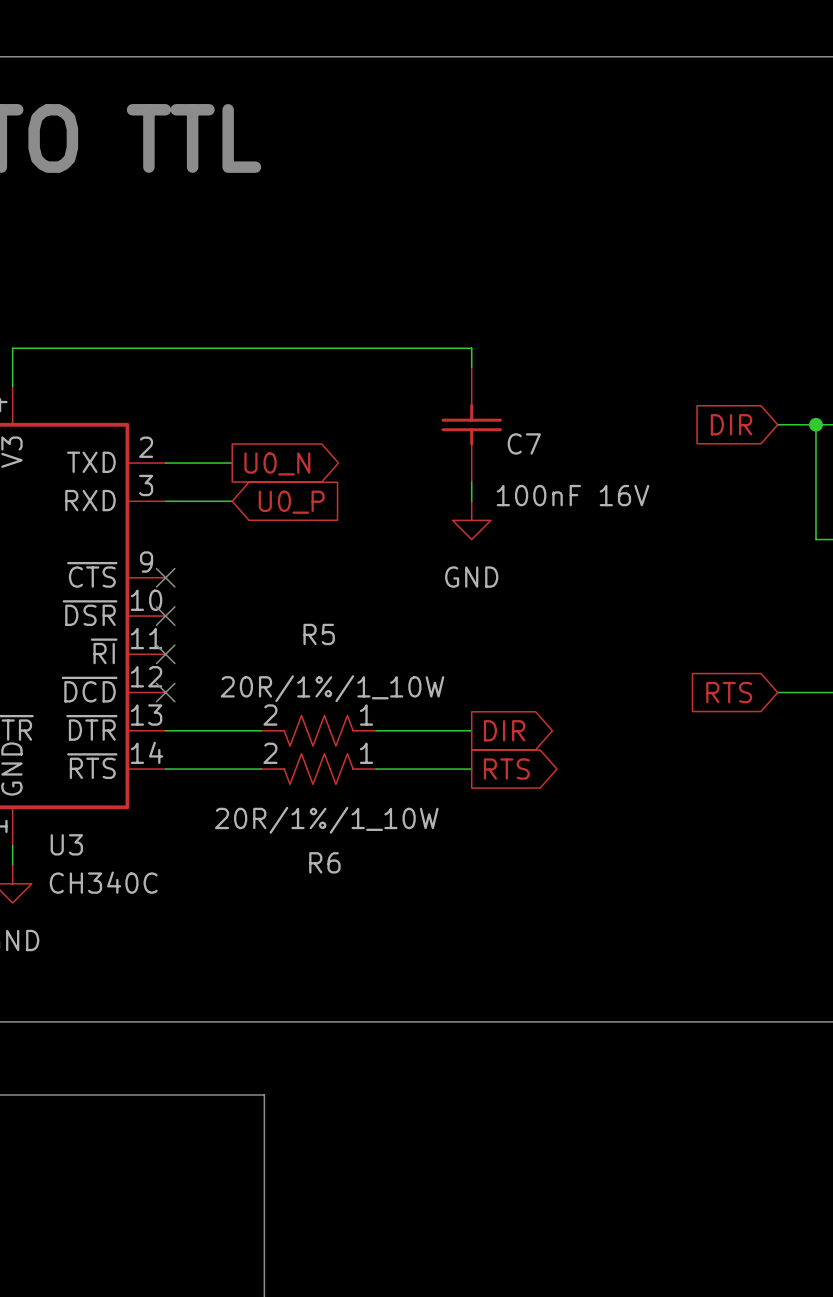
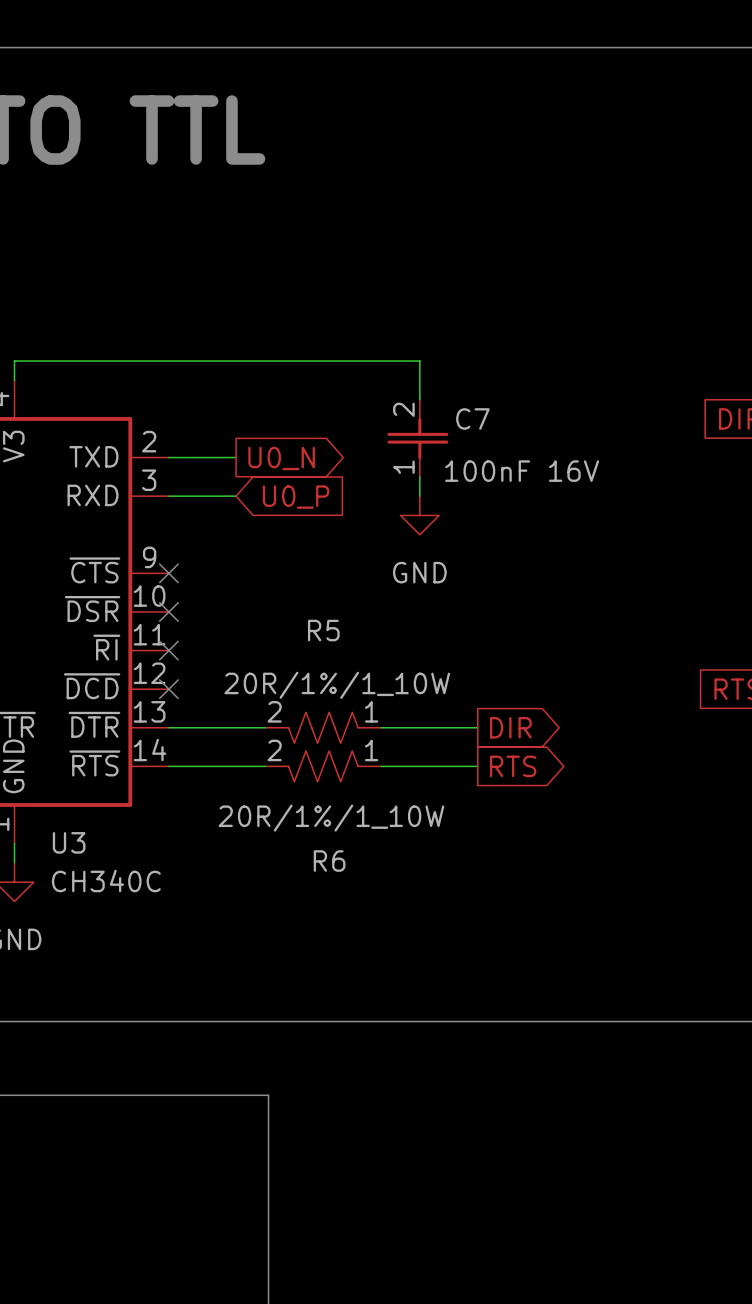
wire: (12, 367) (12, 348) (471, 348) (471, 367) -> (14, 361) (419, 361) (419, 399)
C7 symbol: [441, 367, 502, 483] -> [387, 399, 449, 477]
C7 name position: C7 (524, 443) -> C7 (472, 418)
wire: (471, 482) (471, 501) -> (419, 476) (419, 496)
C7 value position: 100nF 16V (573, 495) -> 100nF 16V (522, 471)
power symbol position: GND (471, 520) -> GND (419, 515)

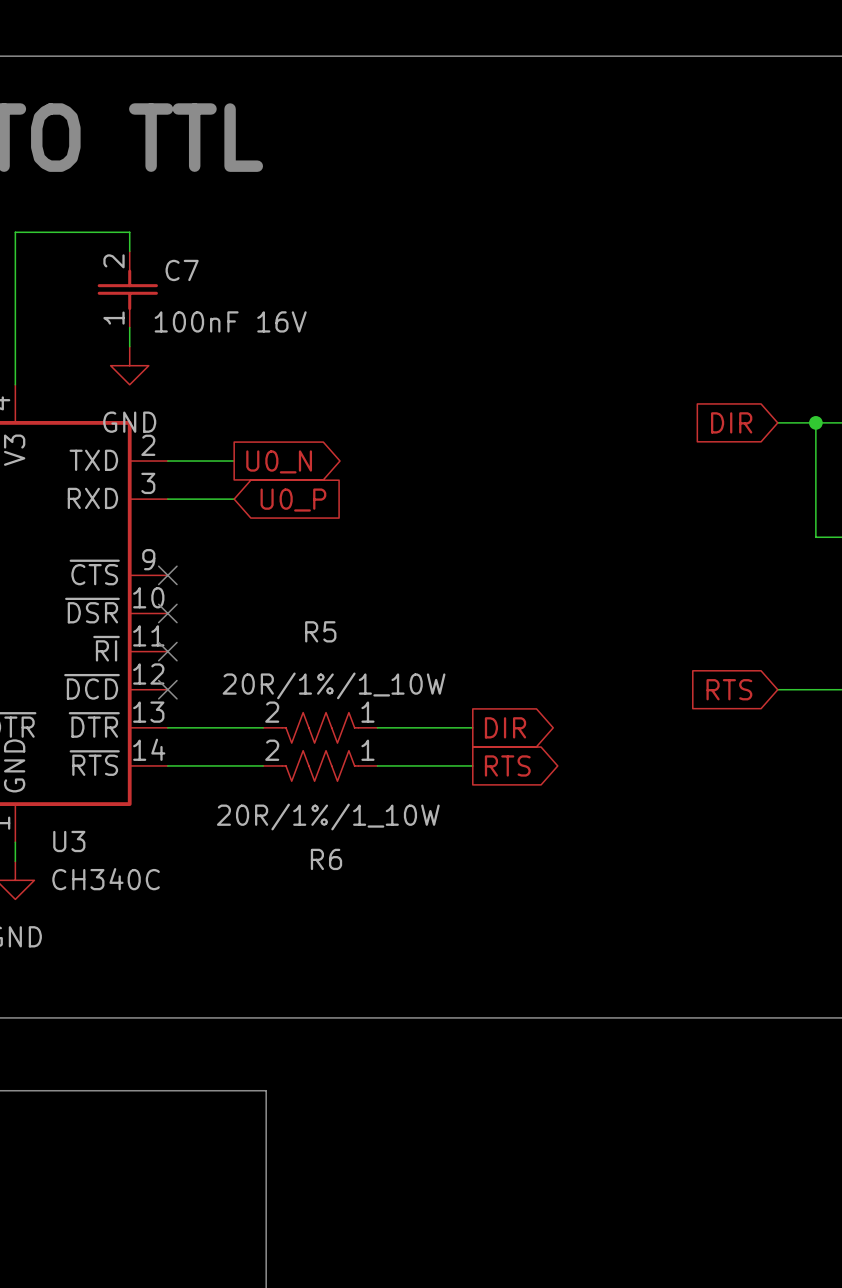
wire: (14, 361) (419, 361) (419, 399) -> (15, 365) (15, 232) (129, 232) (129, 251)
C7 position: (417, 438) -> (127, 289)
wire: (419, 476) (419, 496) -> (129, 327) (129, 346)
power symbol position: GND (419, 515) -> GND (129, 365)

